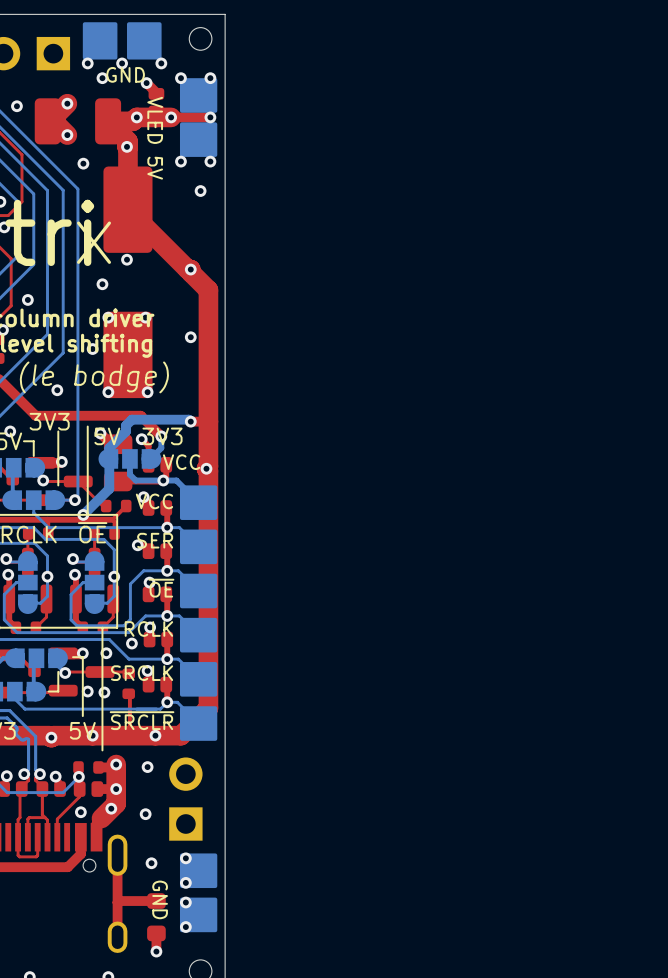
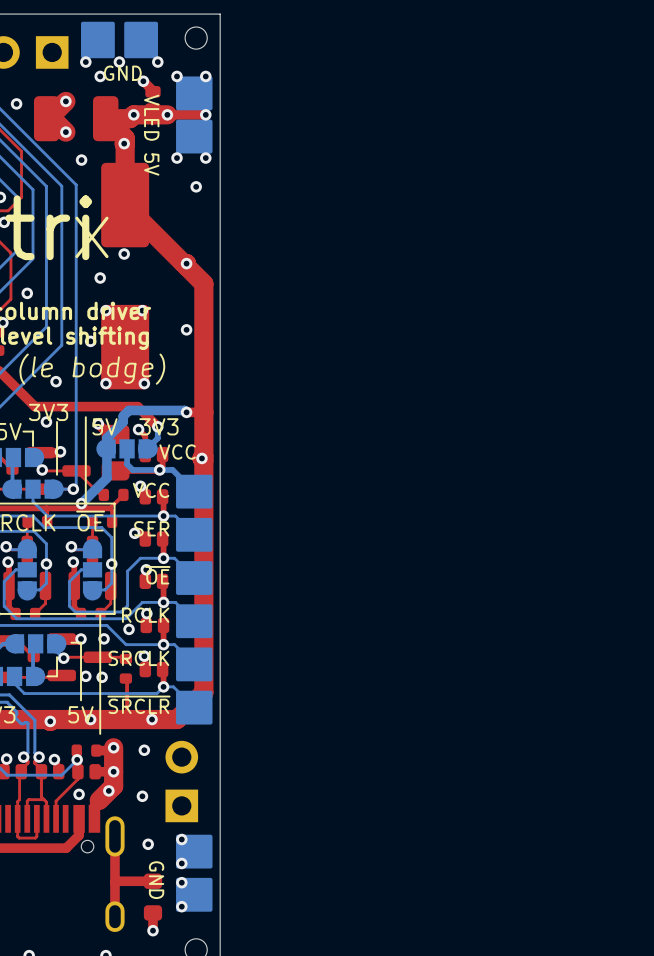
via: (10, 431) -> none
via: none -> (46, 421)

